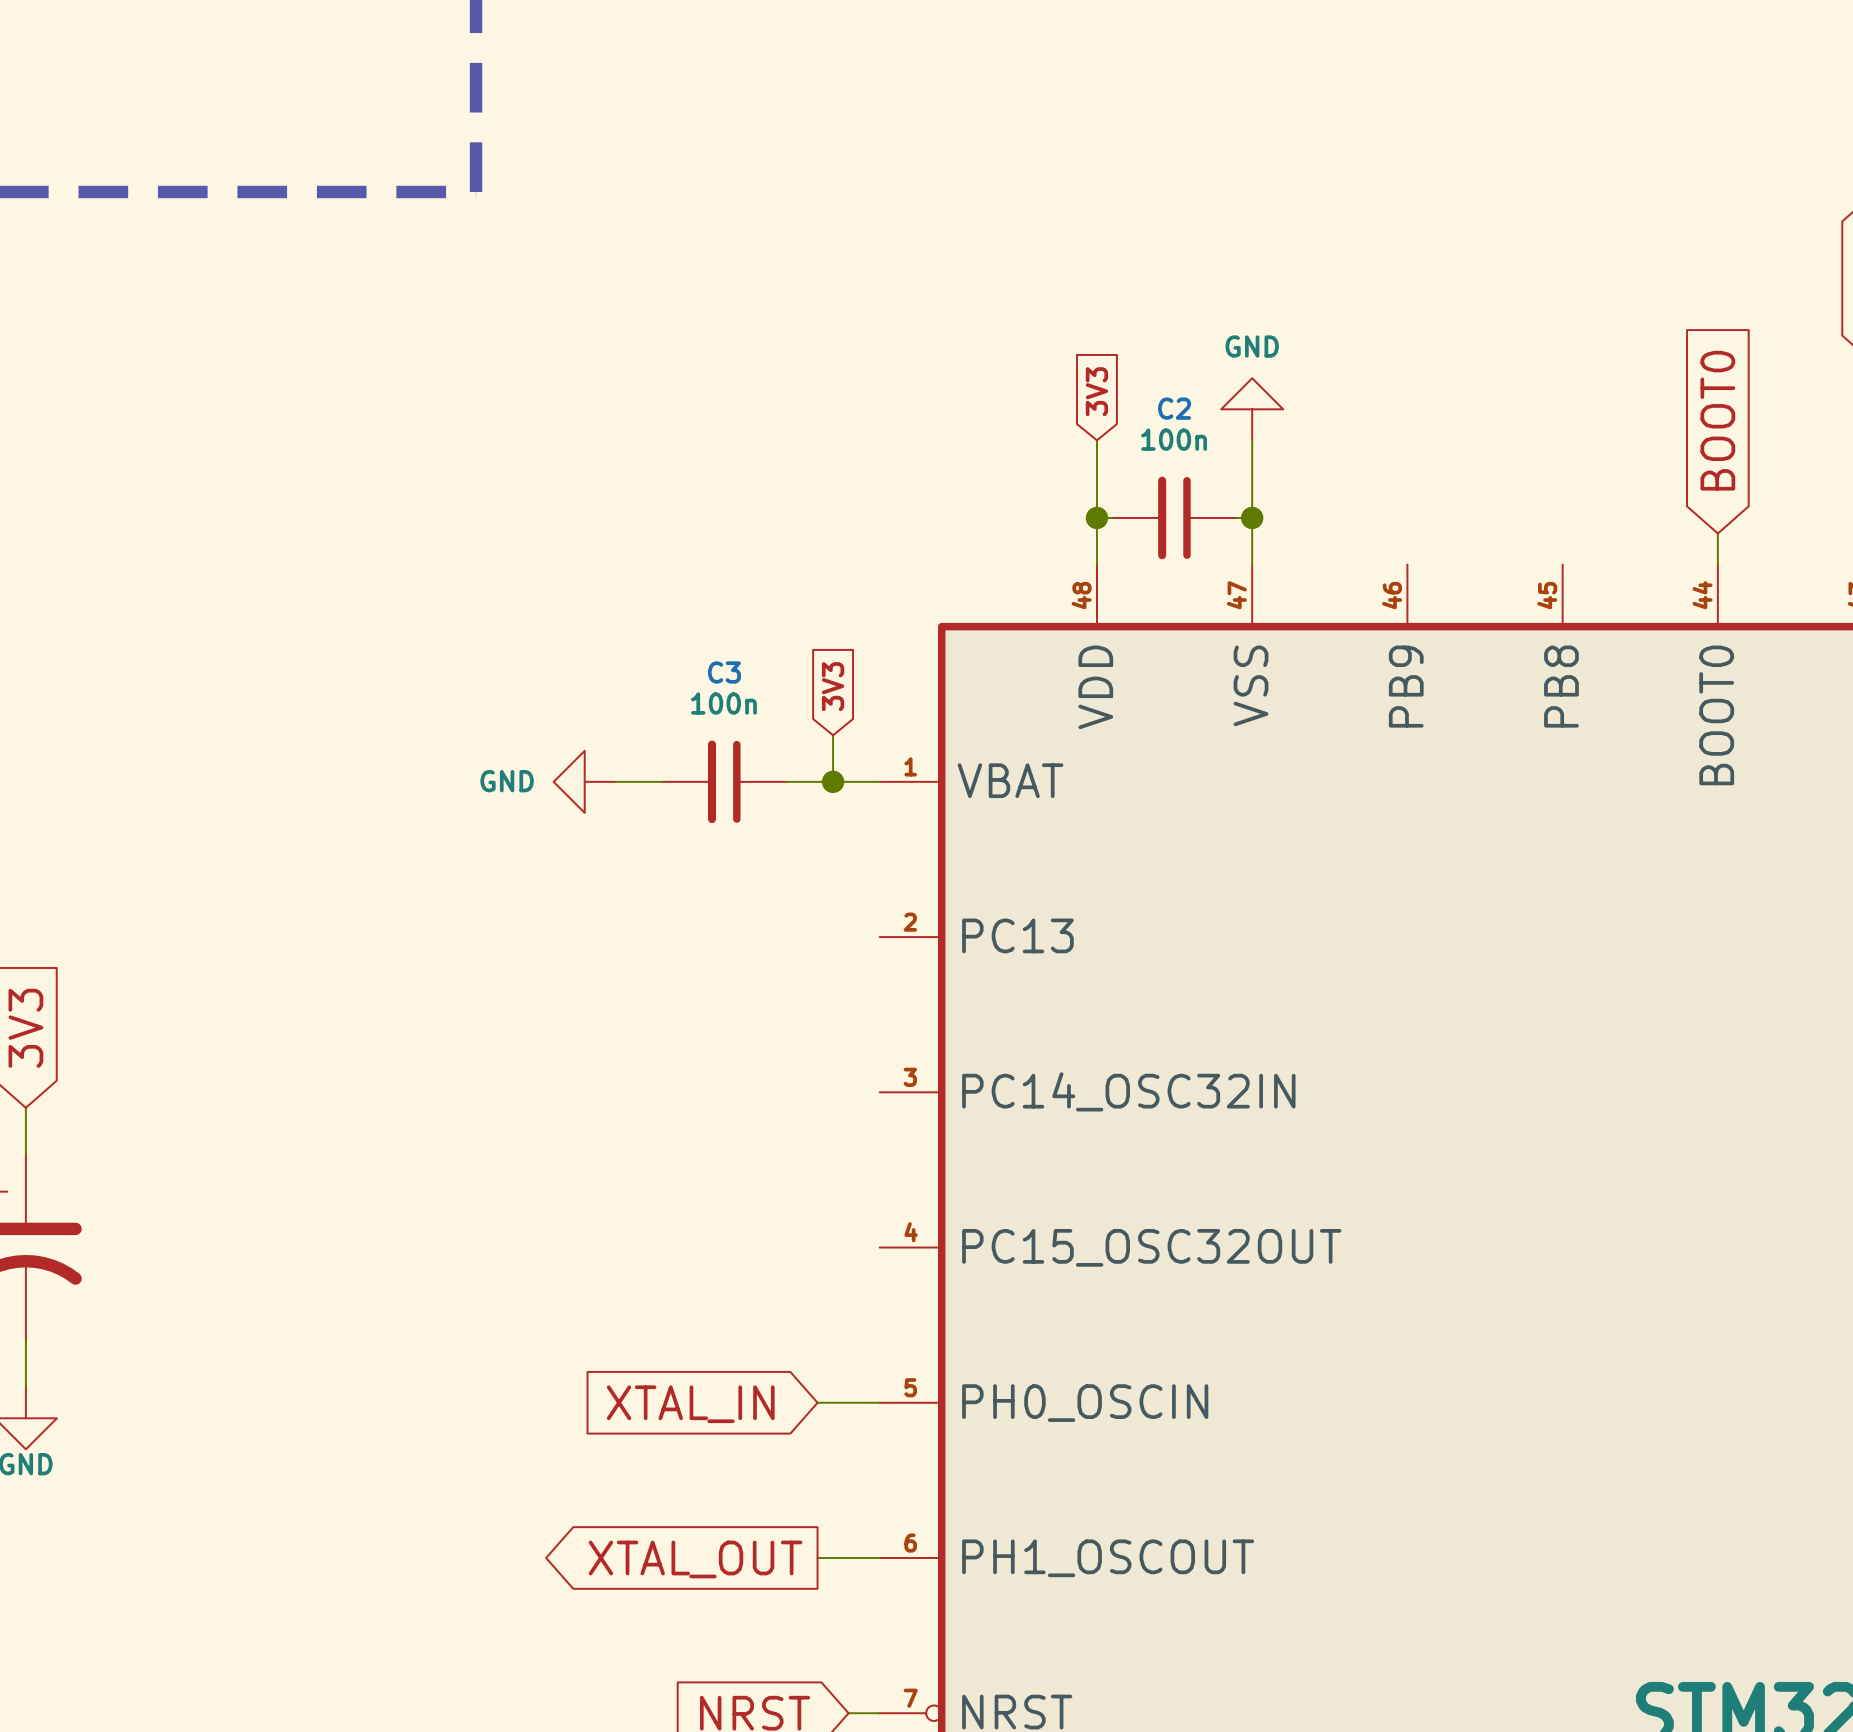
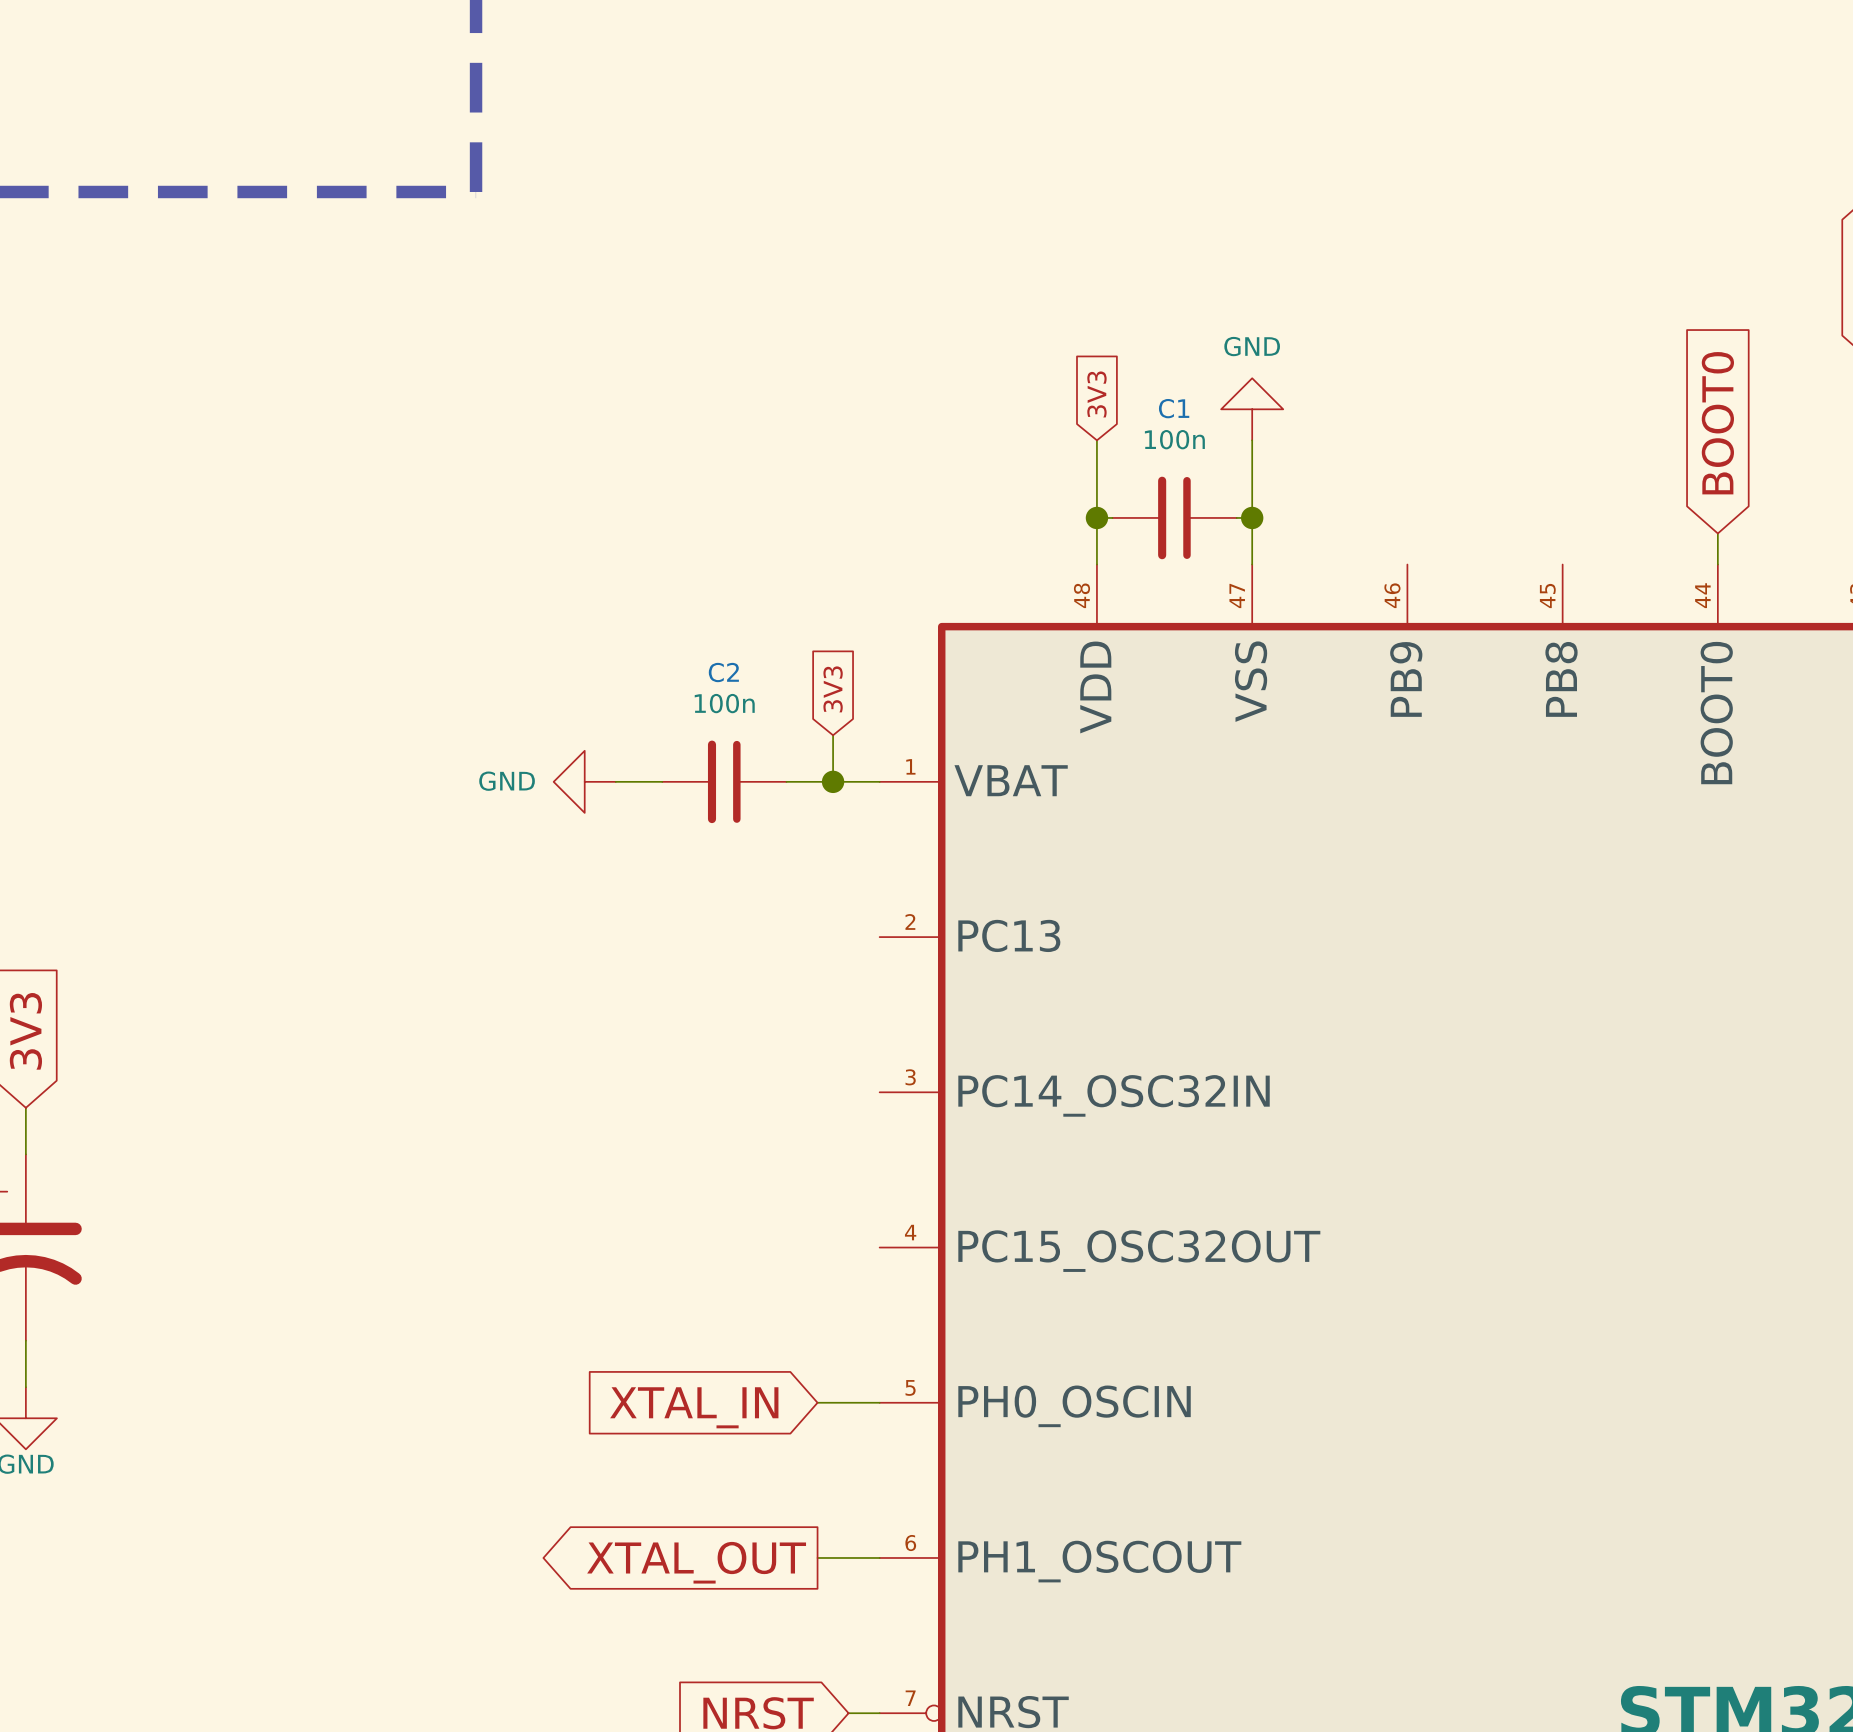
C2 name: C2 (1174, 408) -> C1 (1174, 408)
C3 name: C3 (724, 672) -> C2 (723, 672)

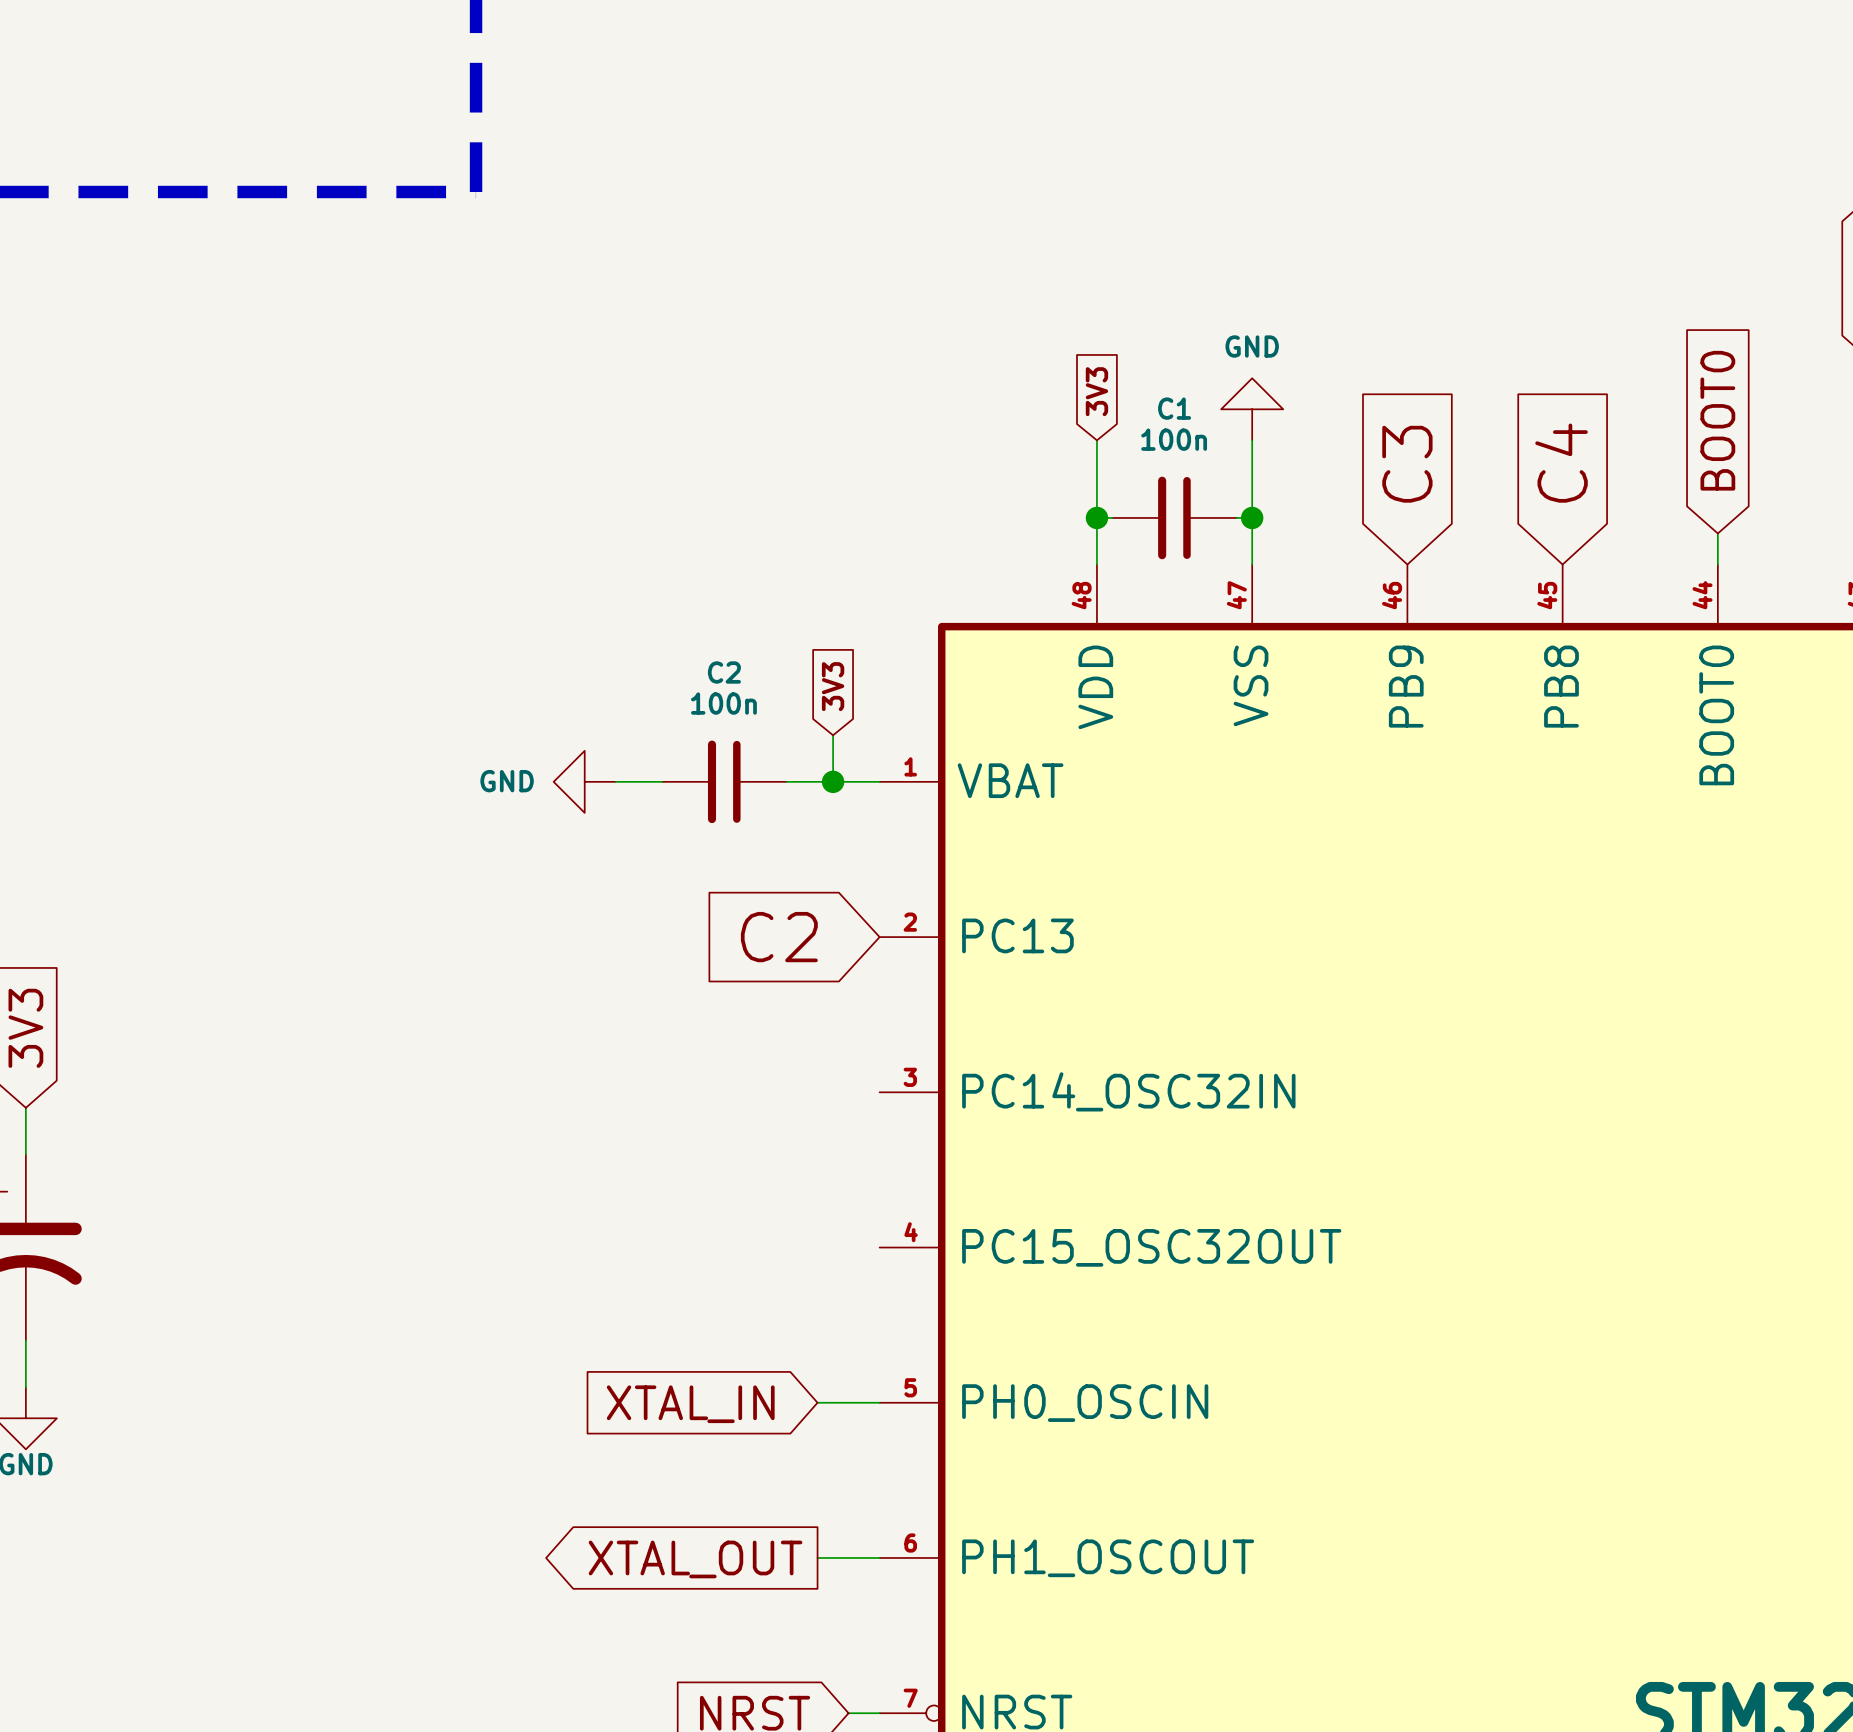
global label: none -> C4 (1561, 463)
global label: none -> C3 (1407, 464)
global label: none -> C2 (779, 937)

